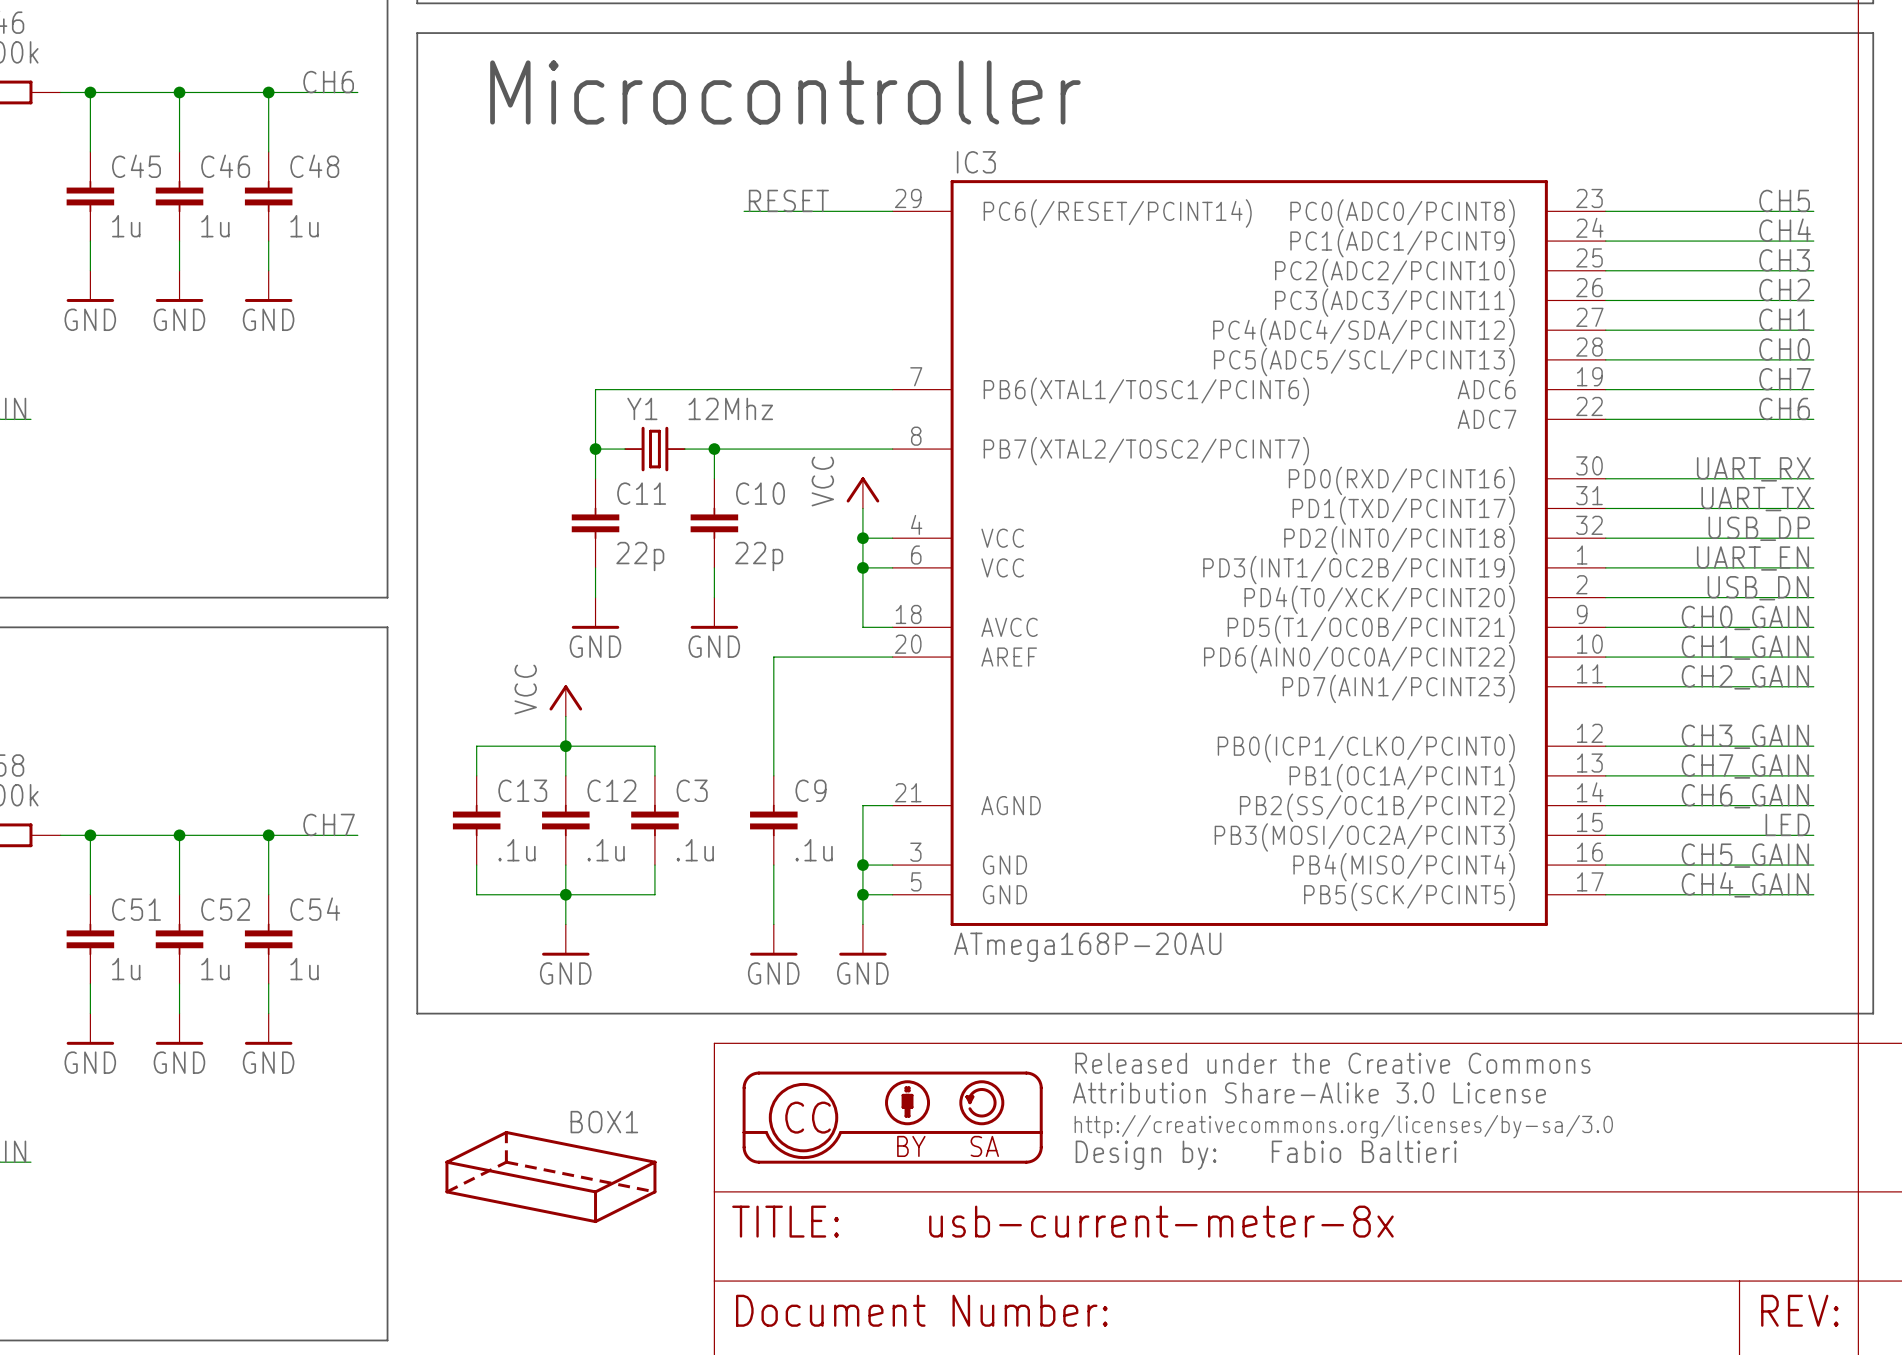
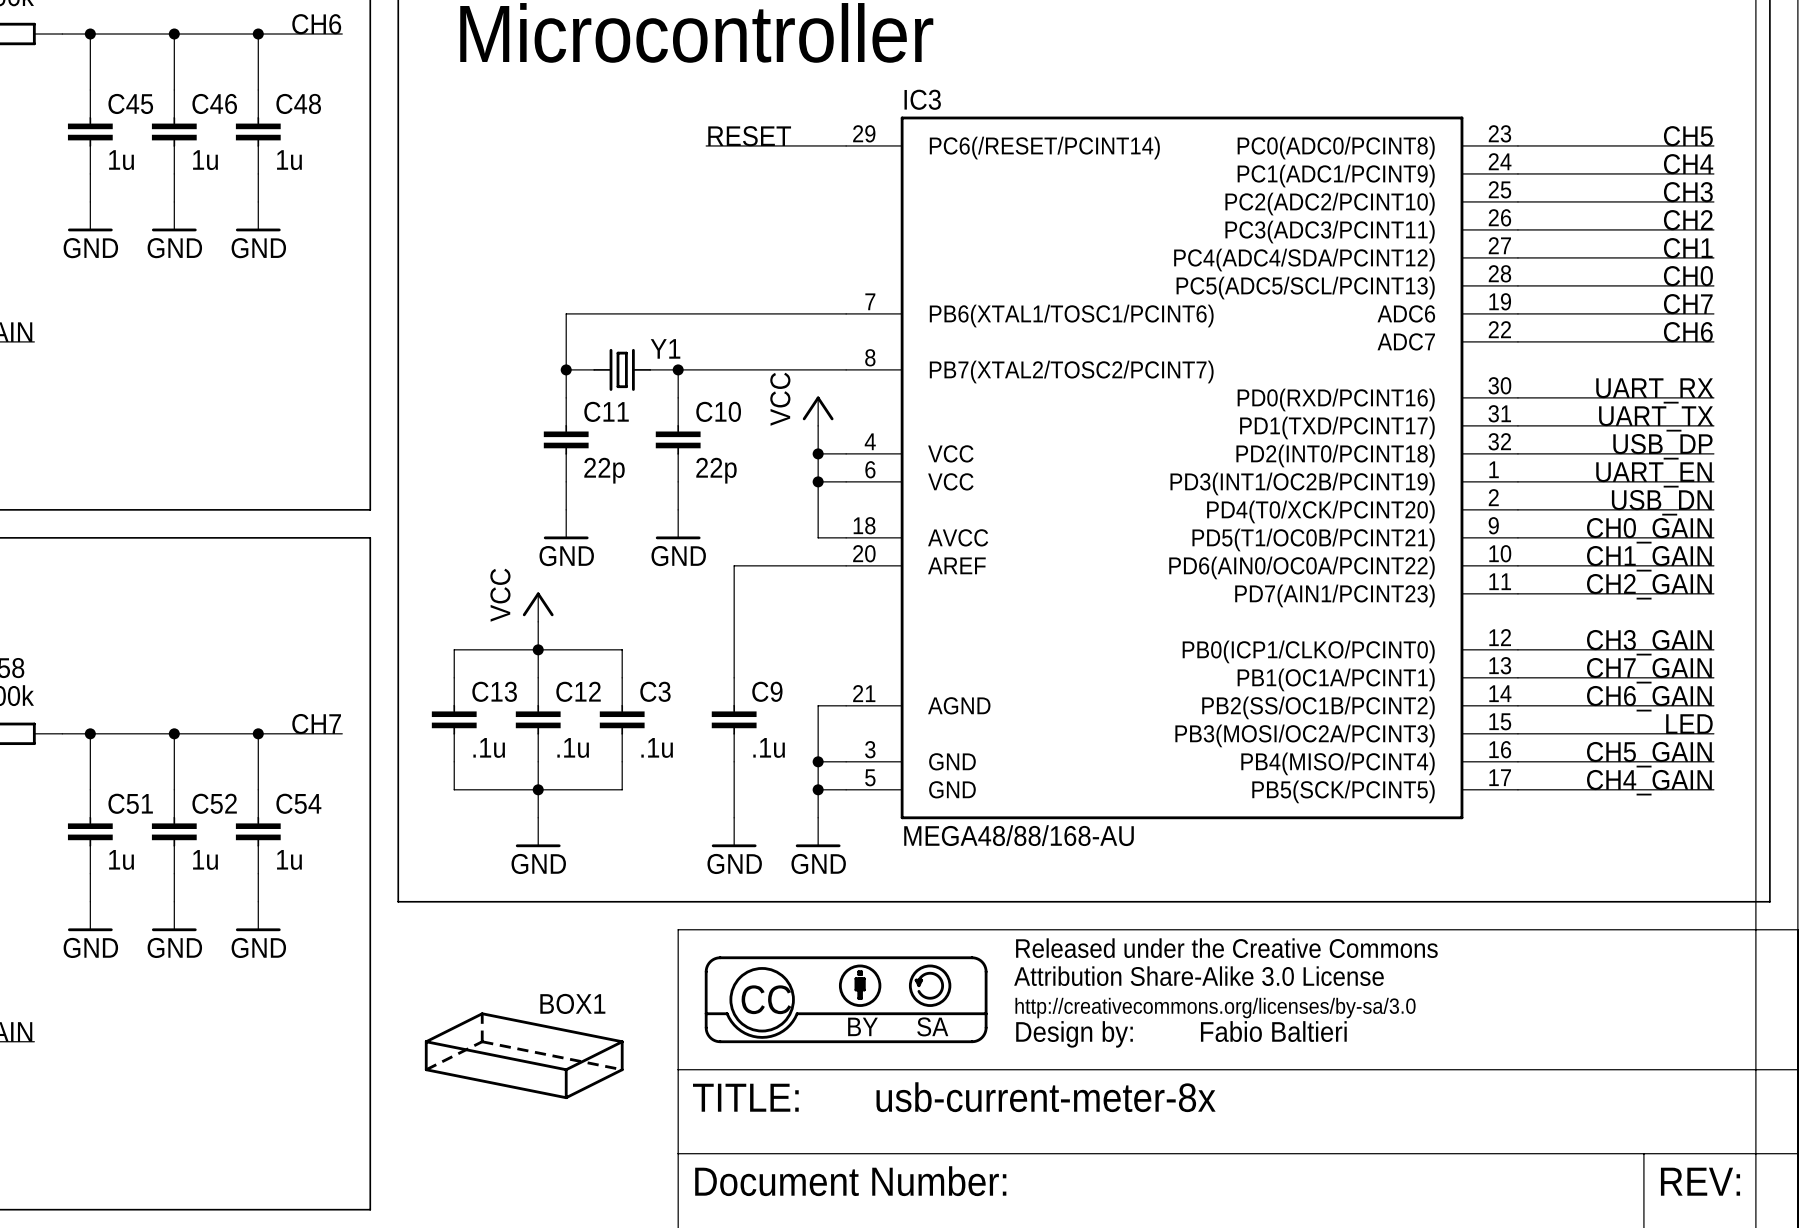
Y1 name position: Y1 (642, 408) -> Y1 (665, 348)
Y1 value: 12Mhz (730, 408) -> none
IC3 value: ATmega168P-20AU (1087, 947) -> MEGA48/88/168-AU (1019, 835)

